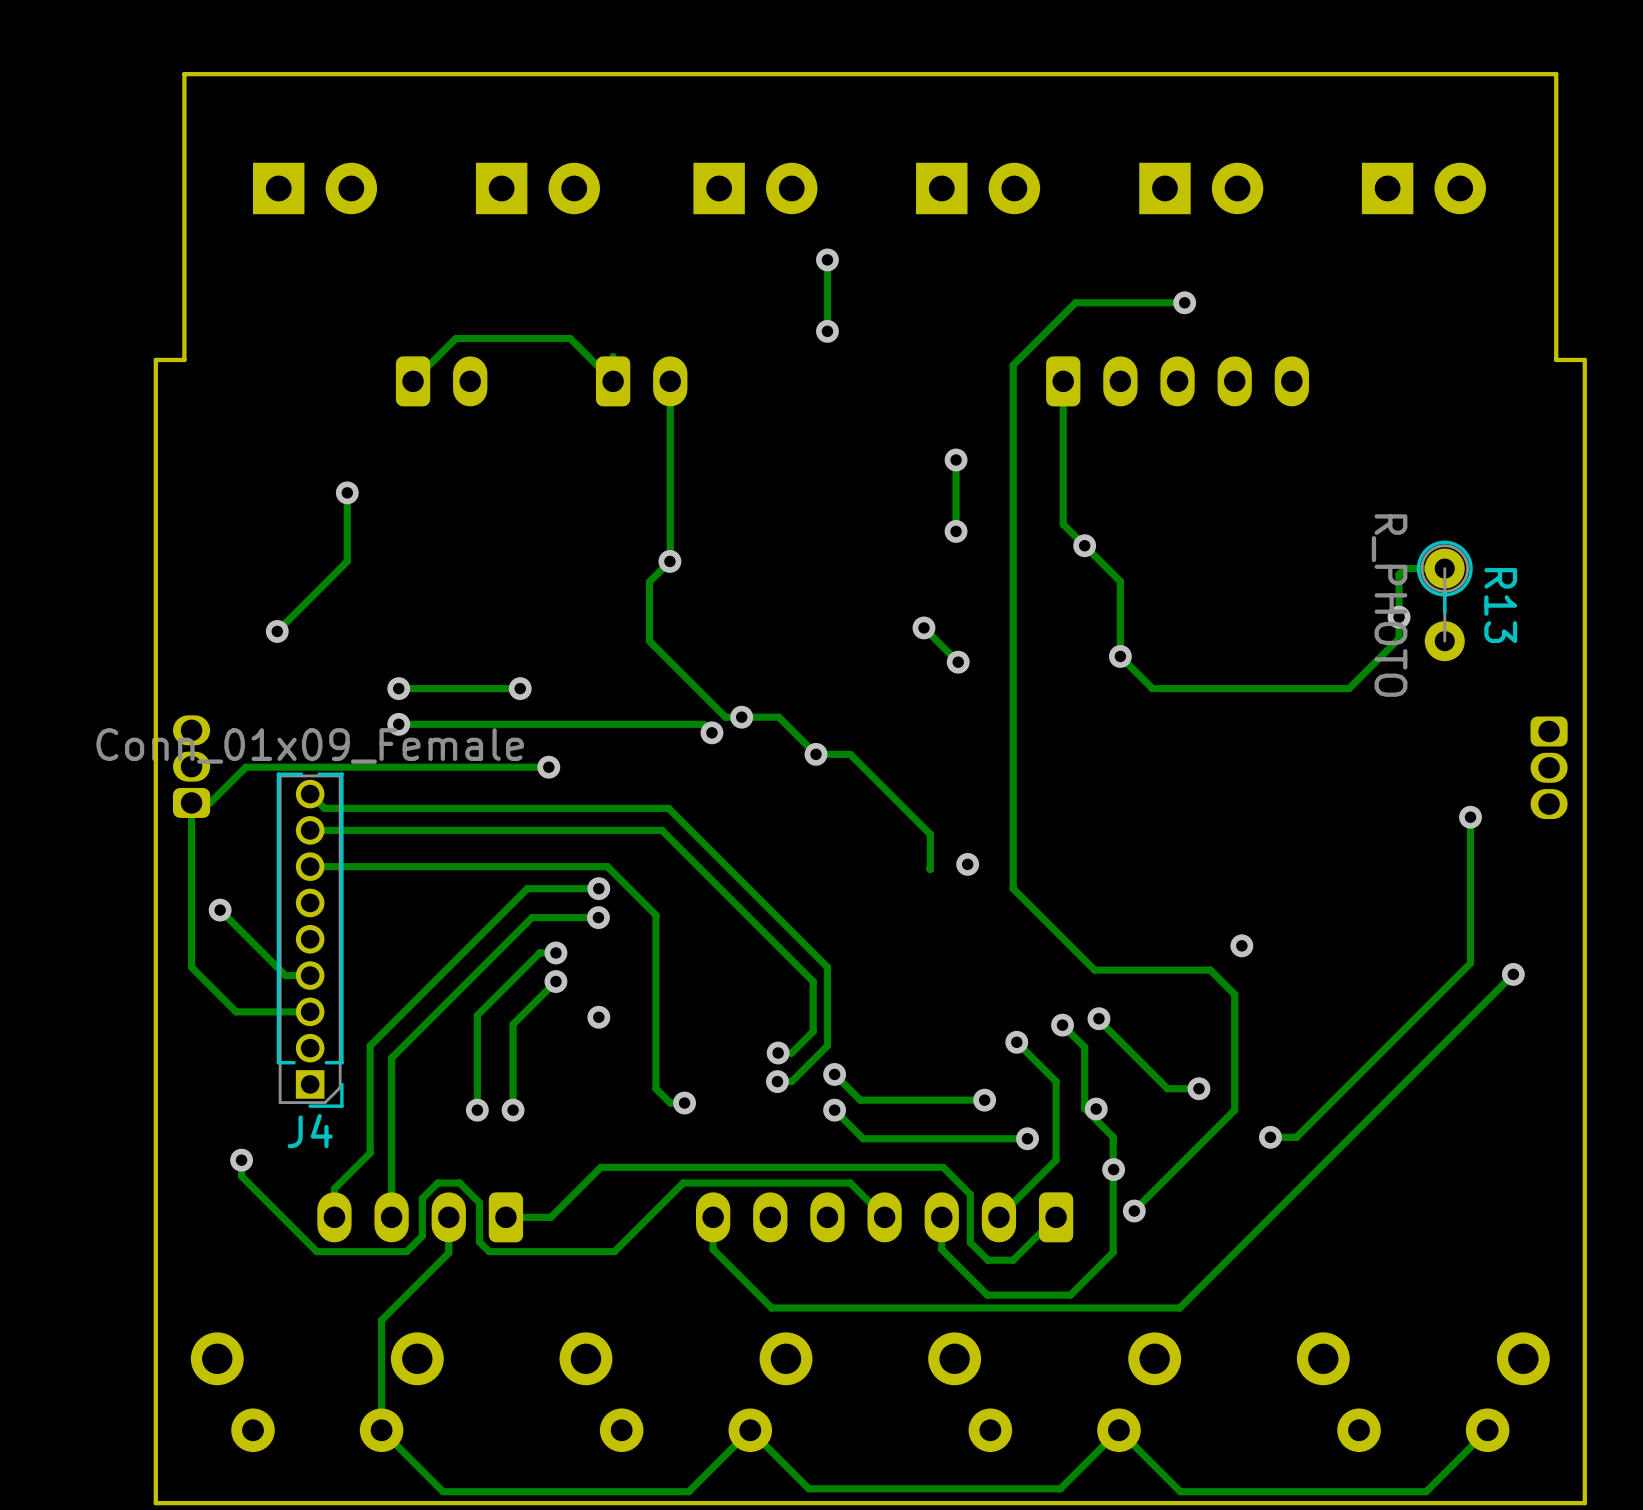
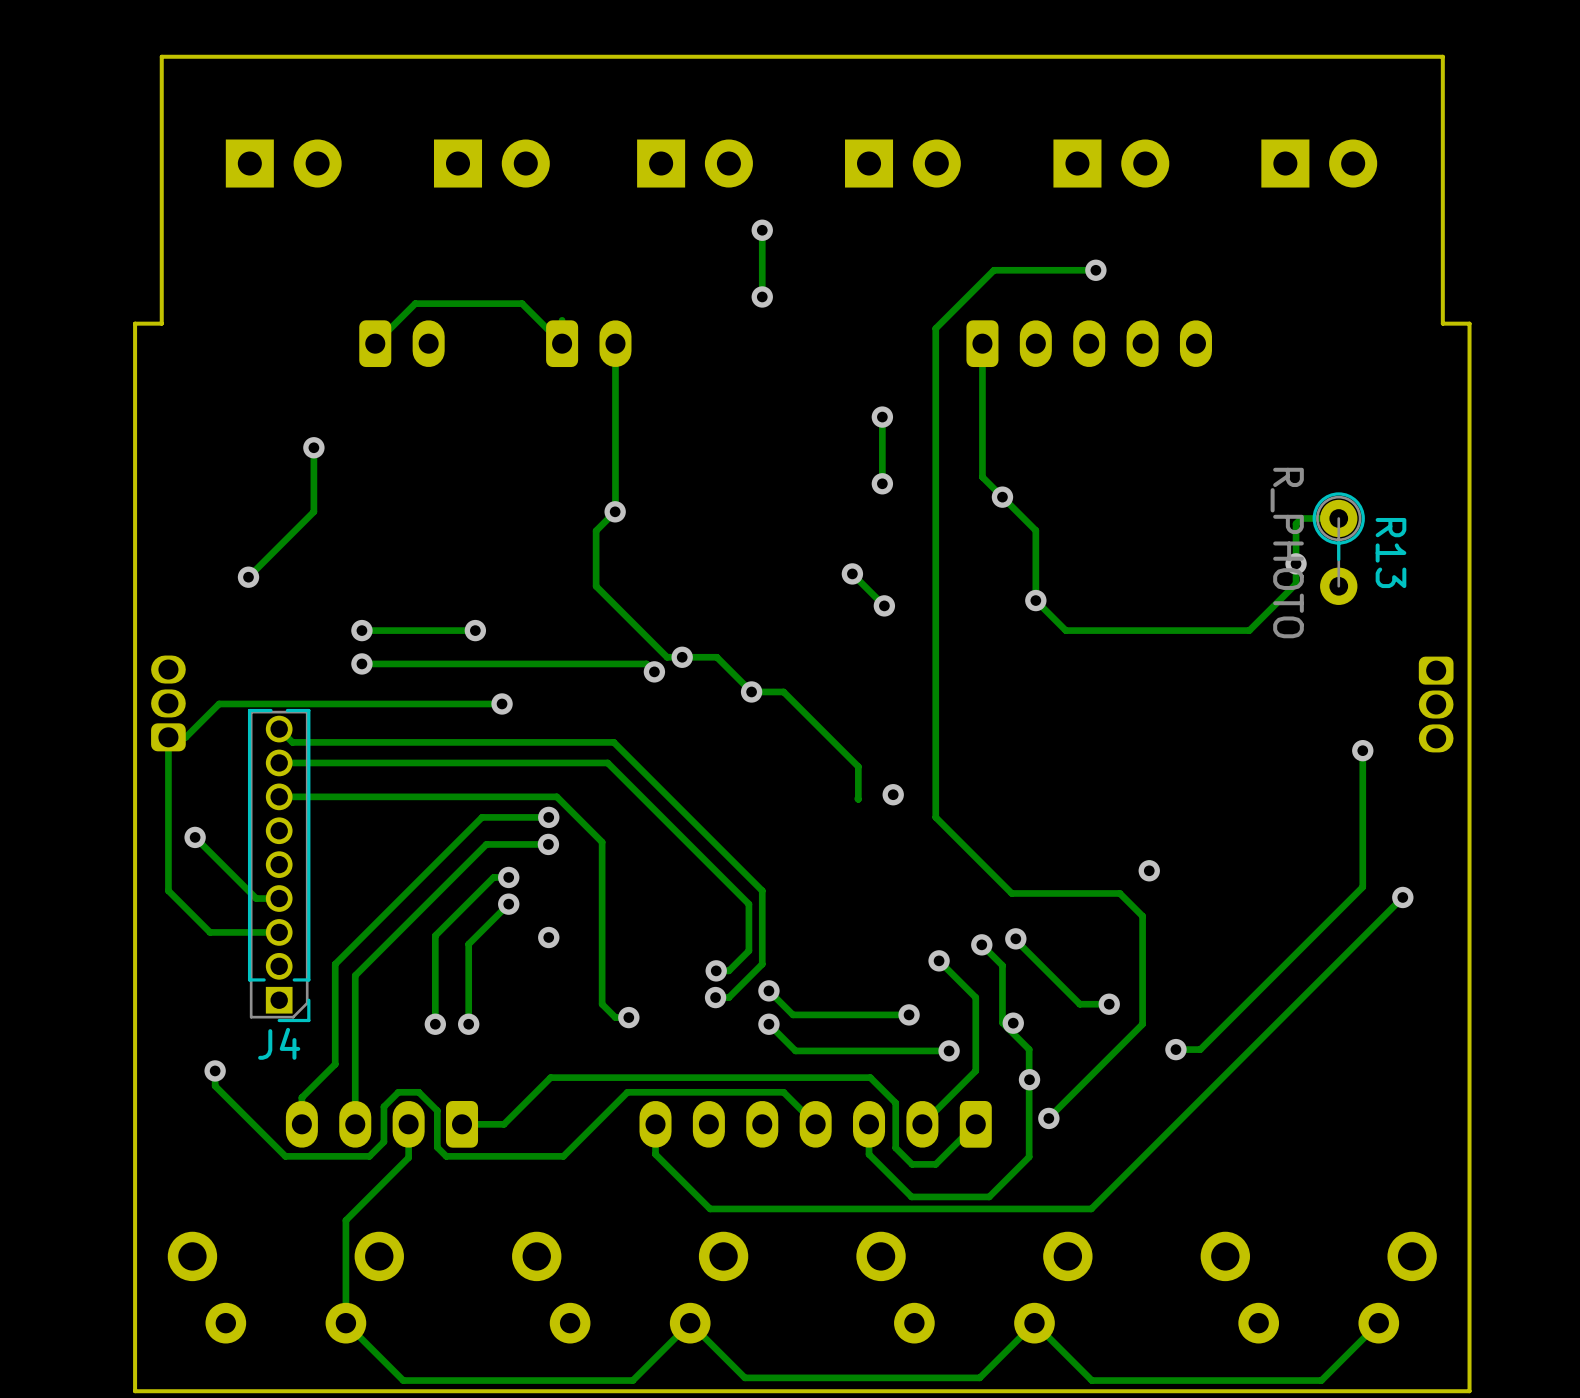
J4 value: Conn_01x09_Female (310, 745) -> none

